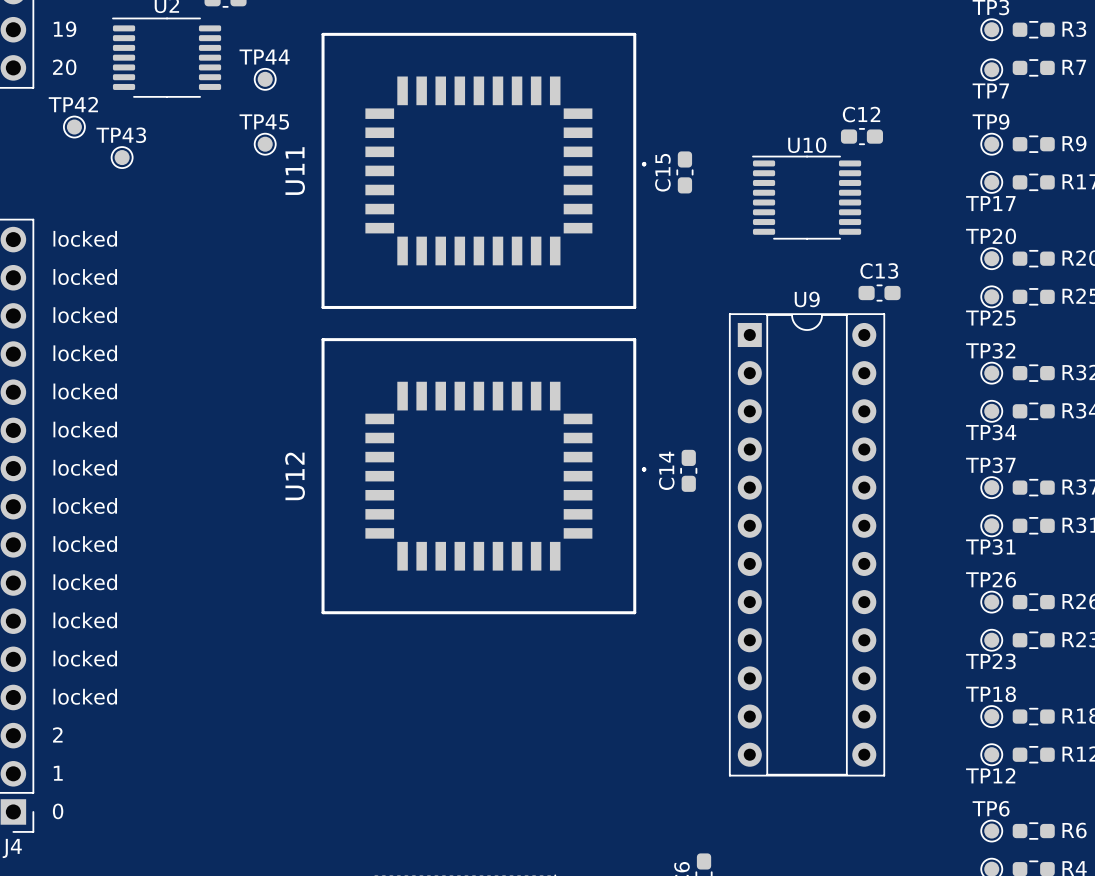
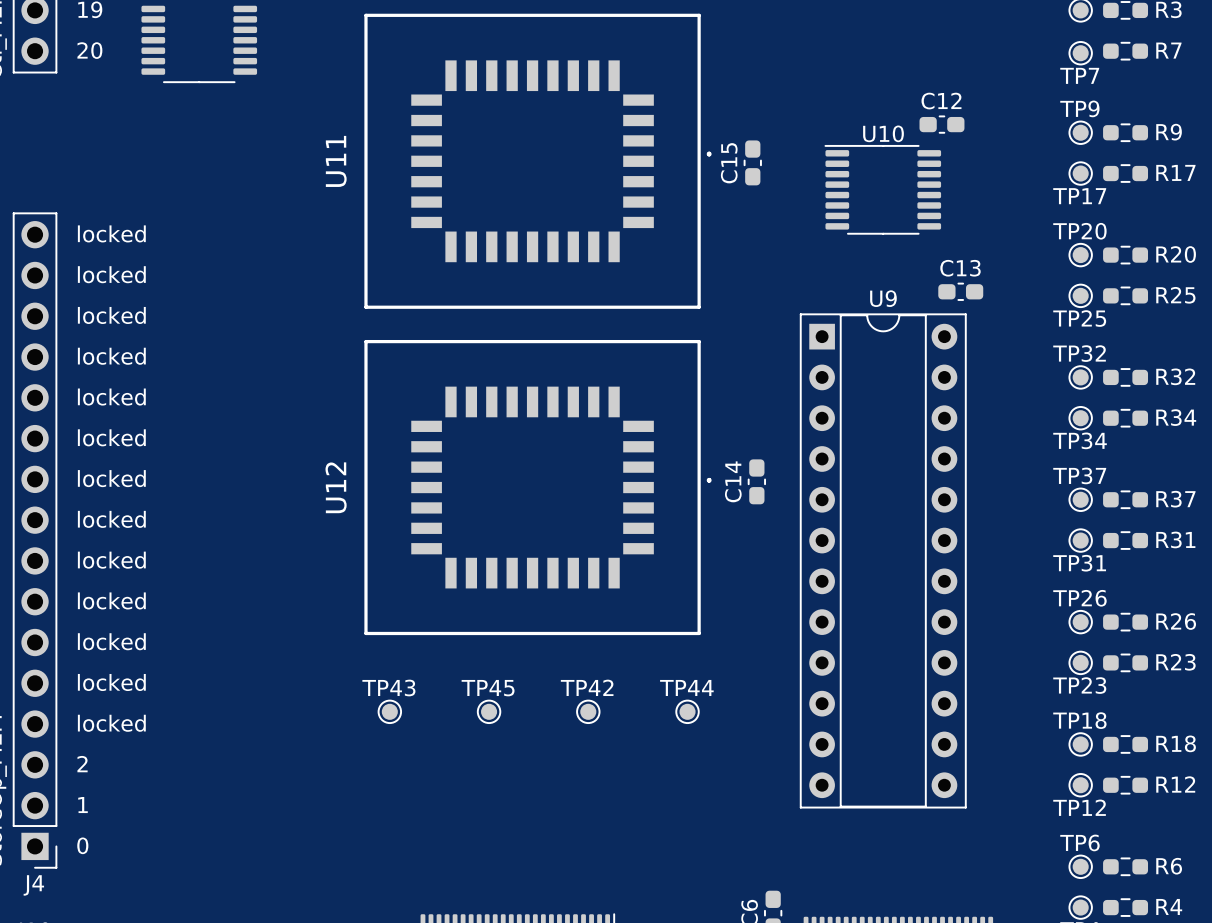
TP44 position: (265, 79) -> (687, 711)
TP42 position: (74, 127) -> (588, 711)
TP45 position: (265, 144) -> (489, 711)
TP43 position: (122, 157) -> (389, 711)

